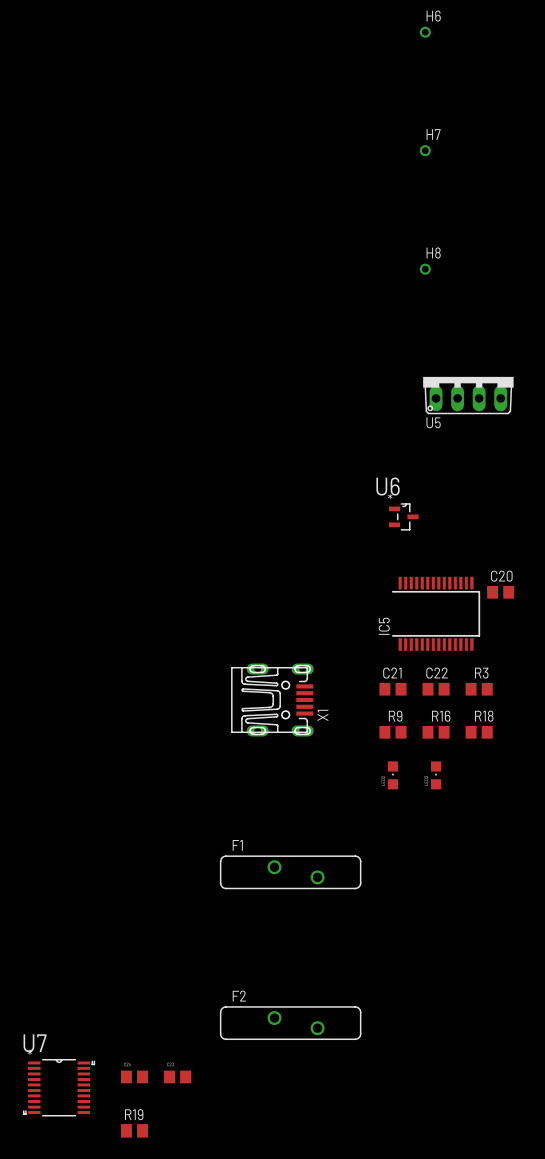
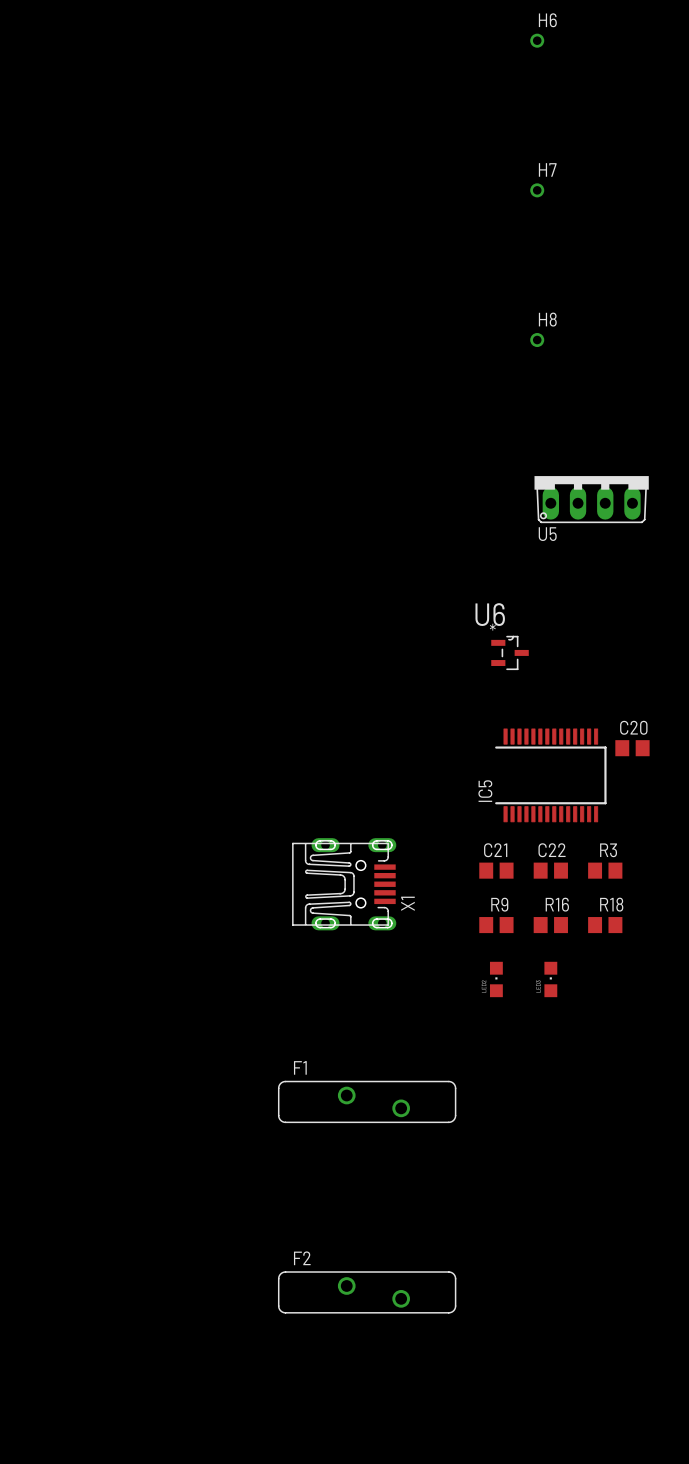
part: (134, 1076) -> none
part: (177, 1076) -> none
U7: (59, 1087) -> none
R19: (134, 1130) -> none

